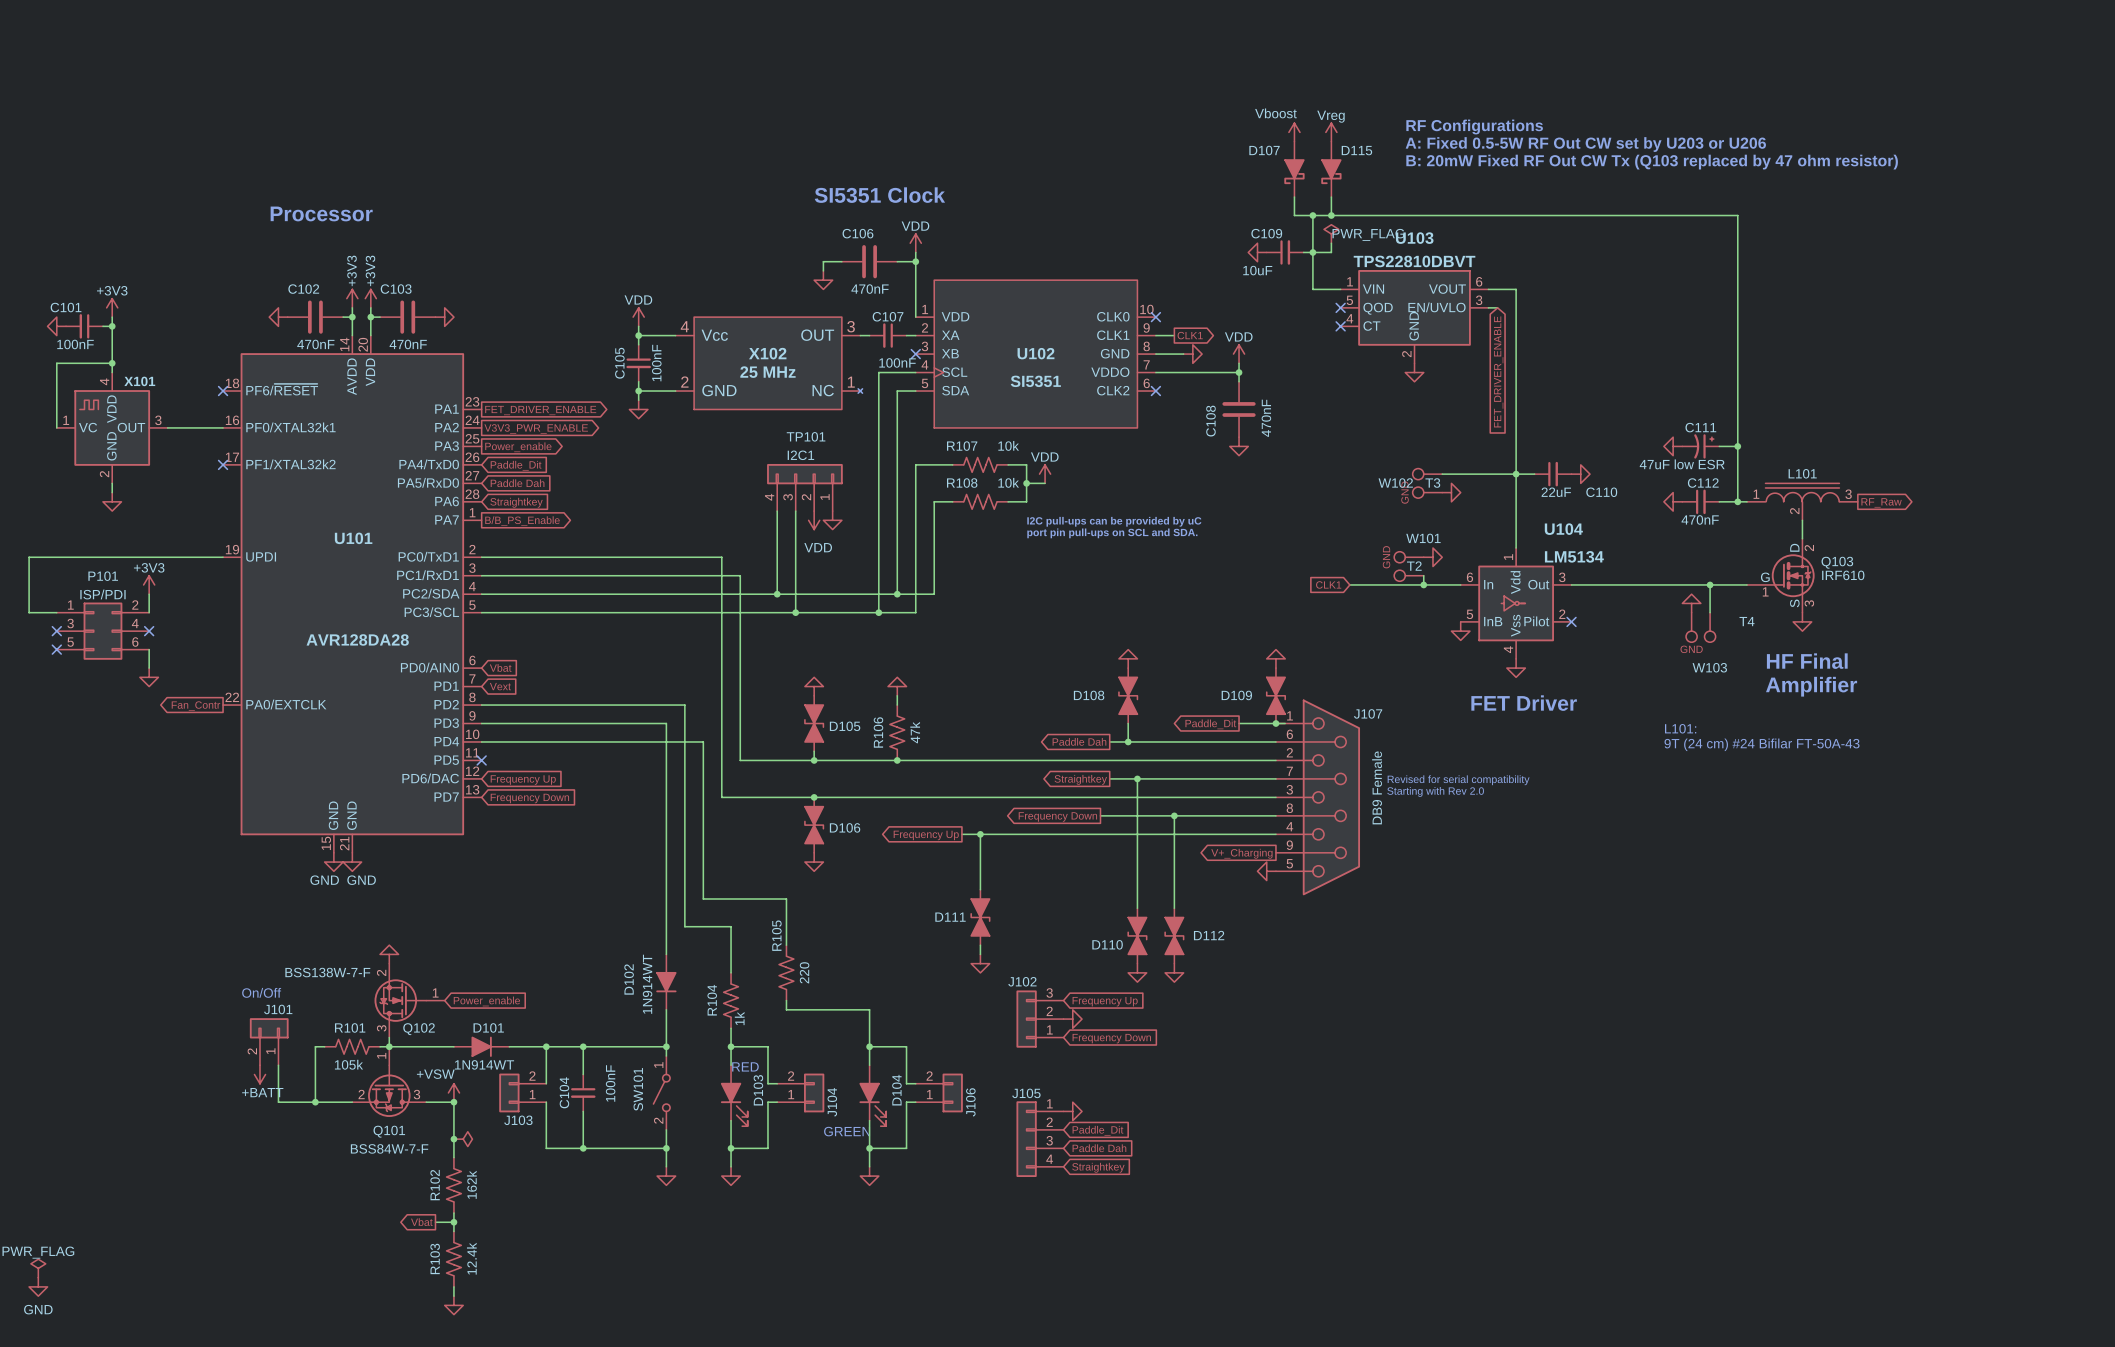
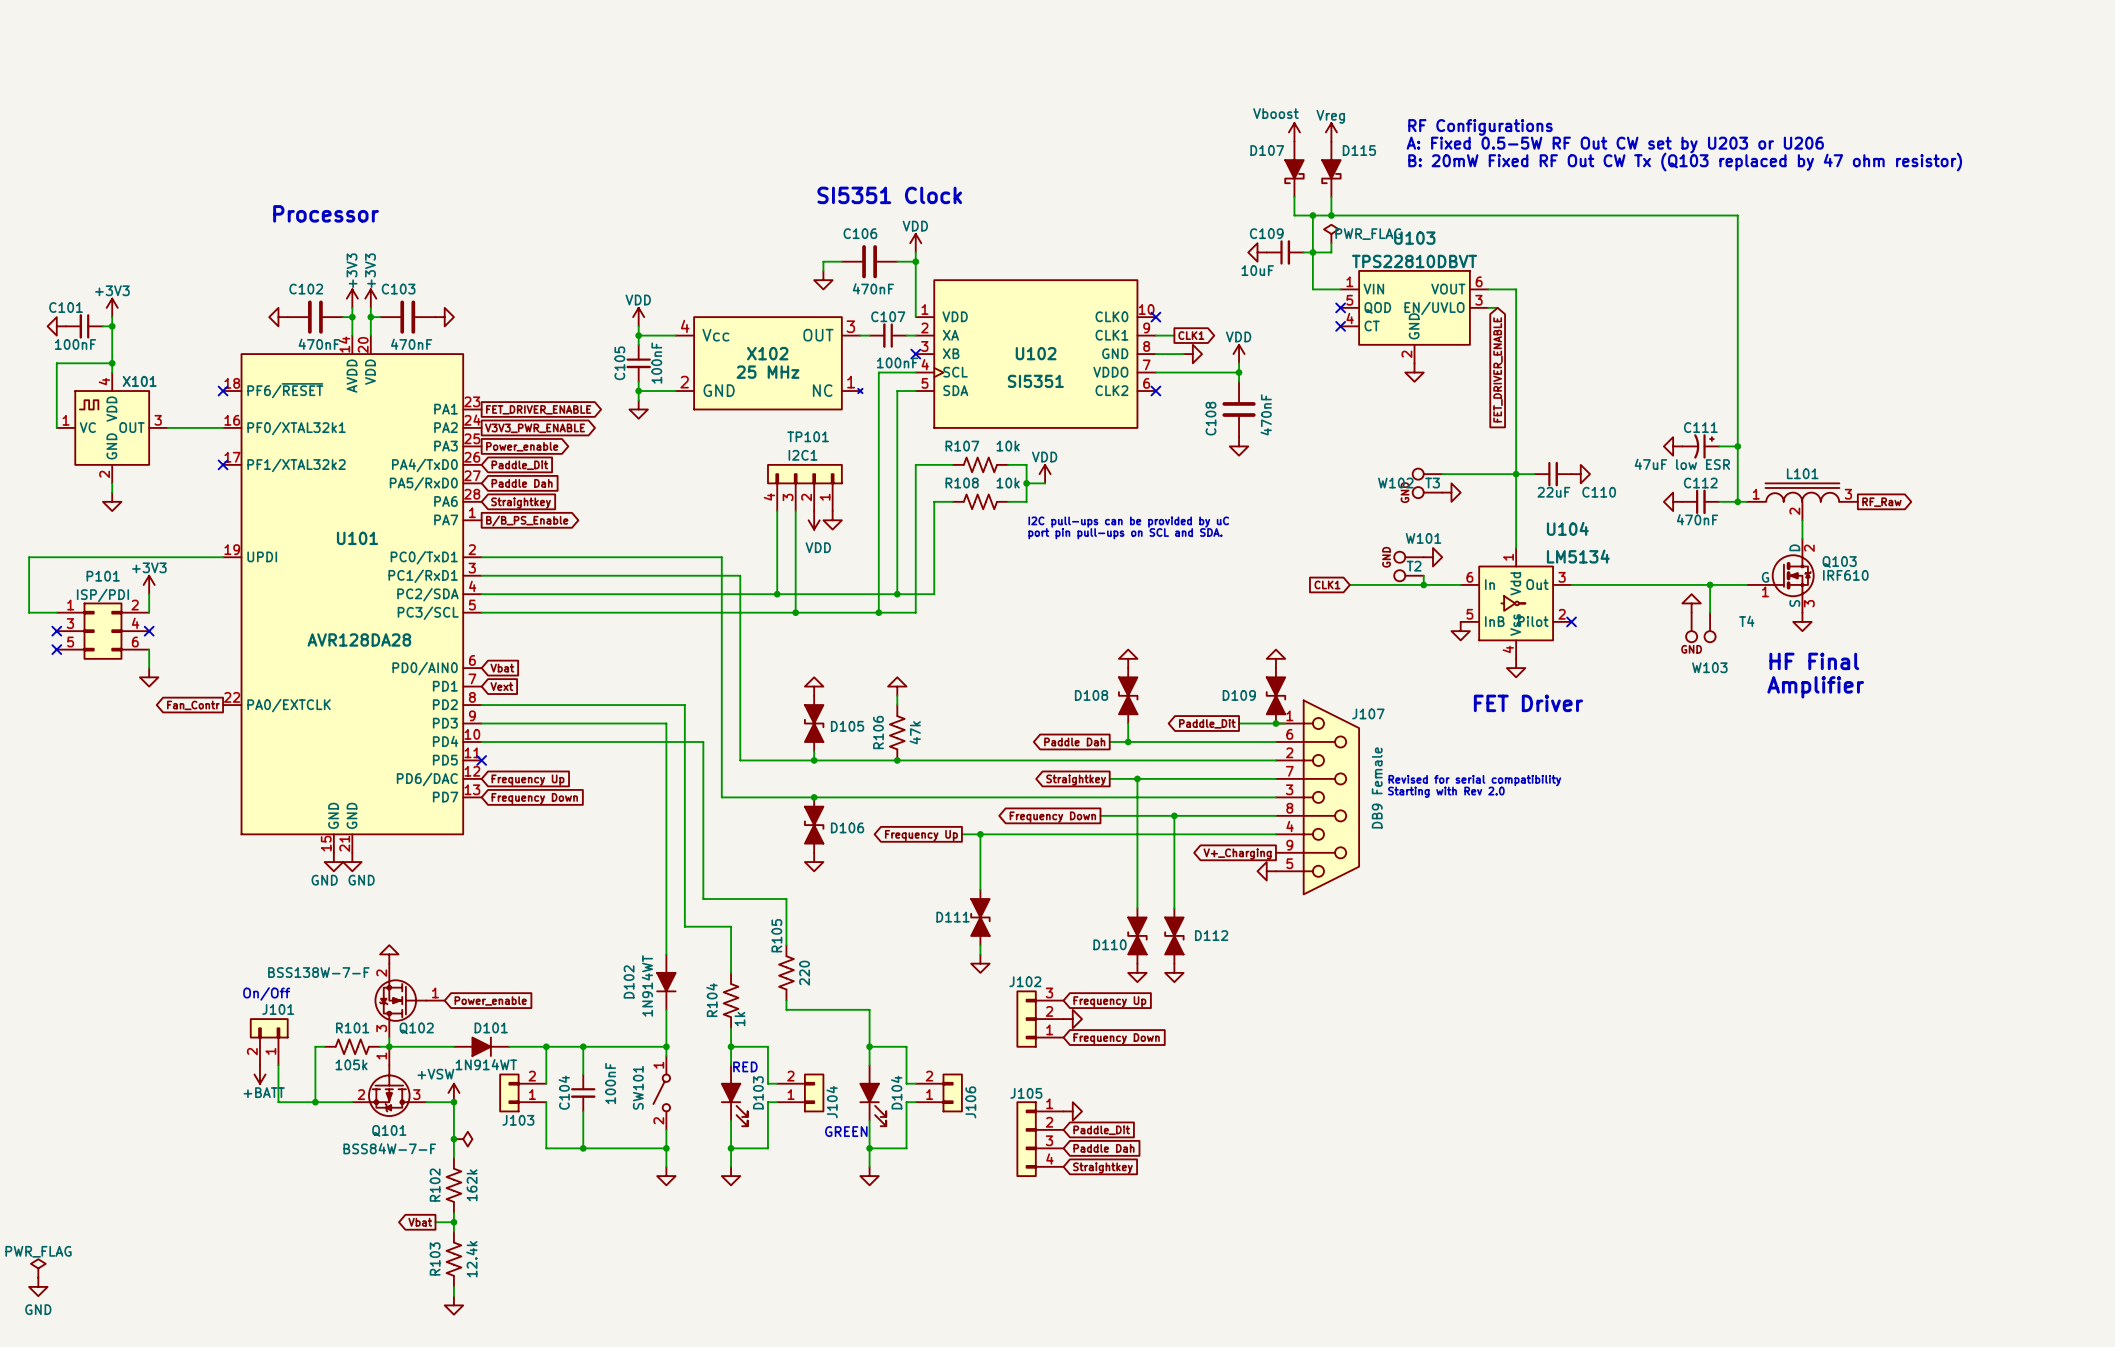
text: L101: (1680, 728) -> none
text: 9T (24 cm) #24 Bifilar FT-50A-43 (1762, 744) -> none

